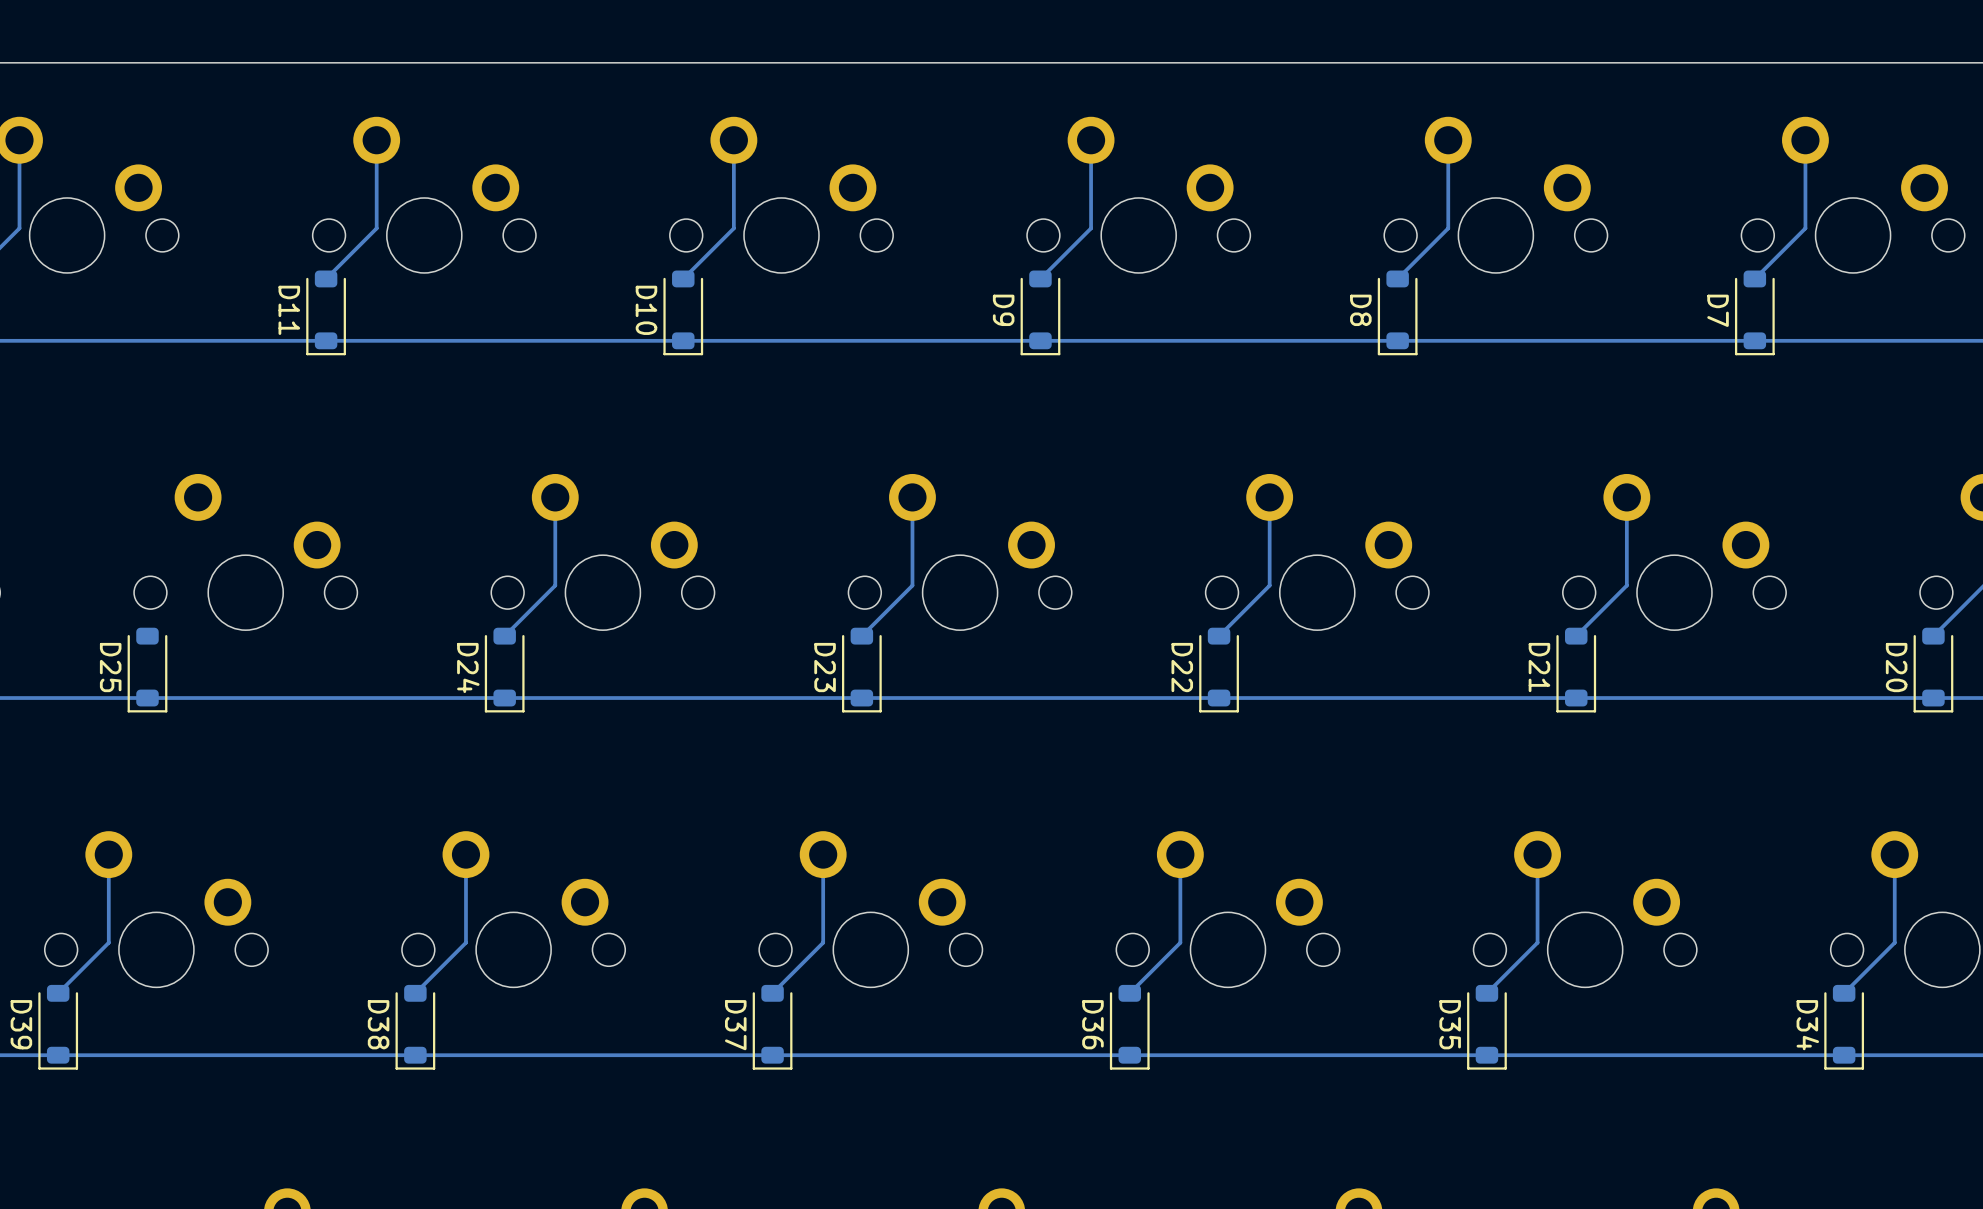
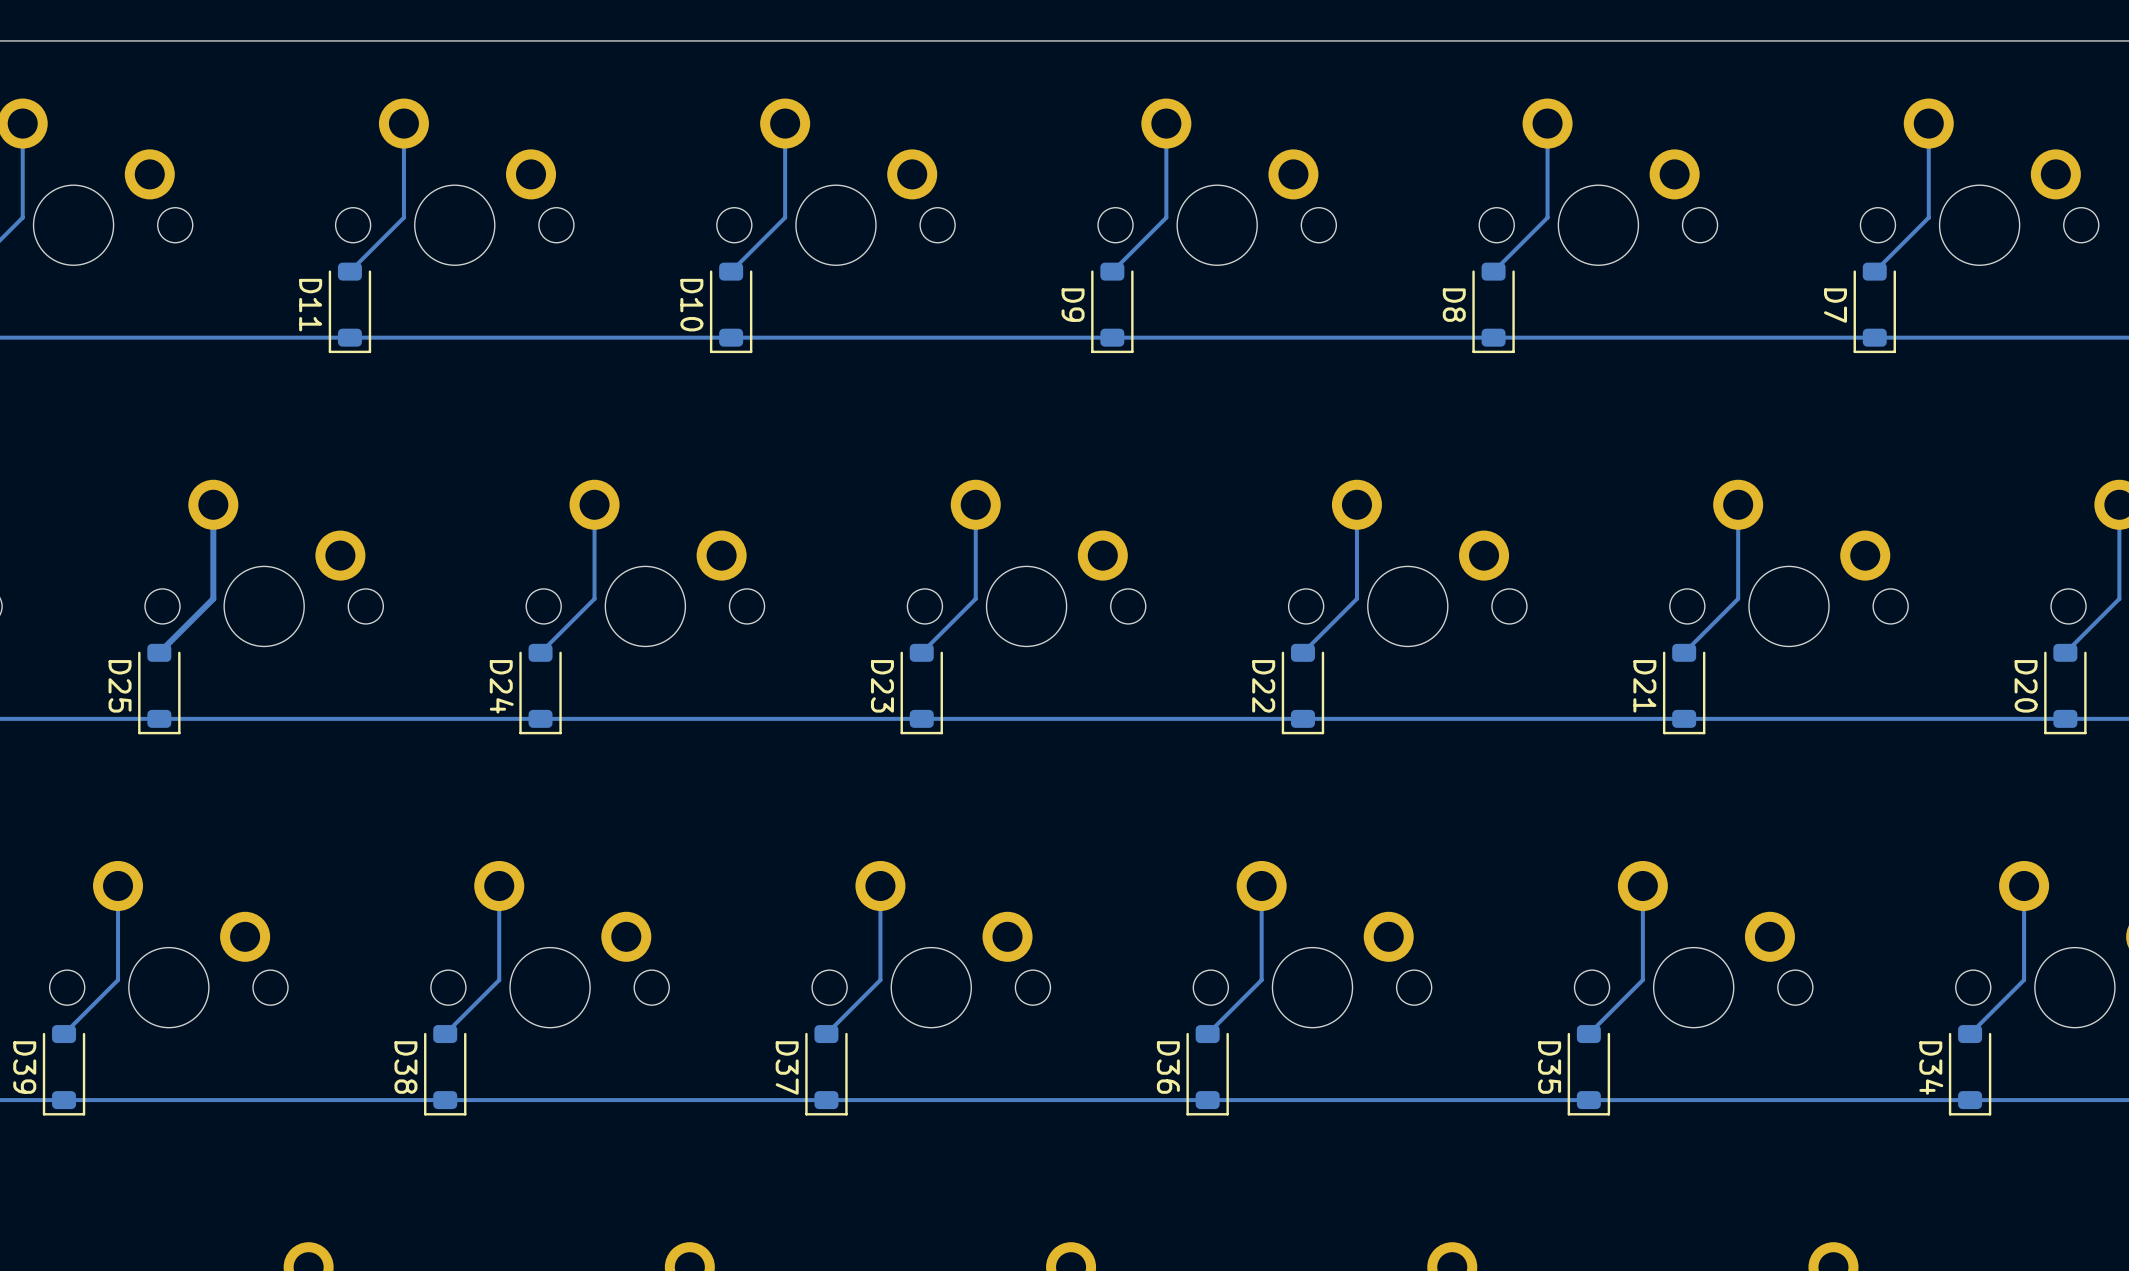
track: none -> (213, 504) (213, 598) (159, 652)

